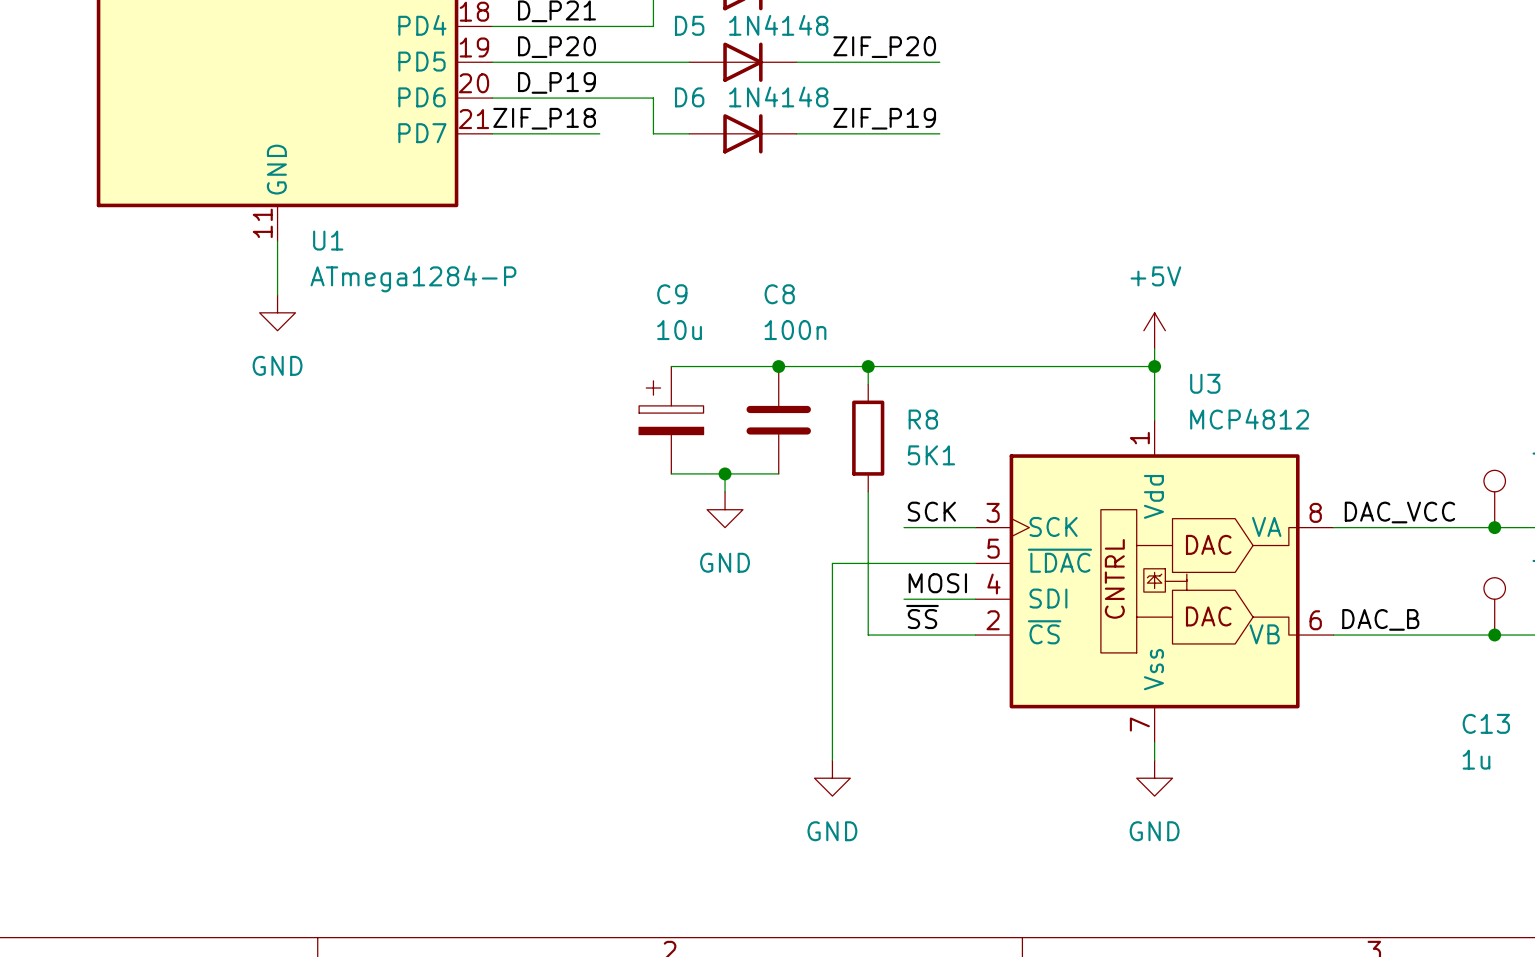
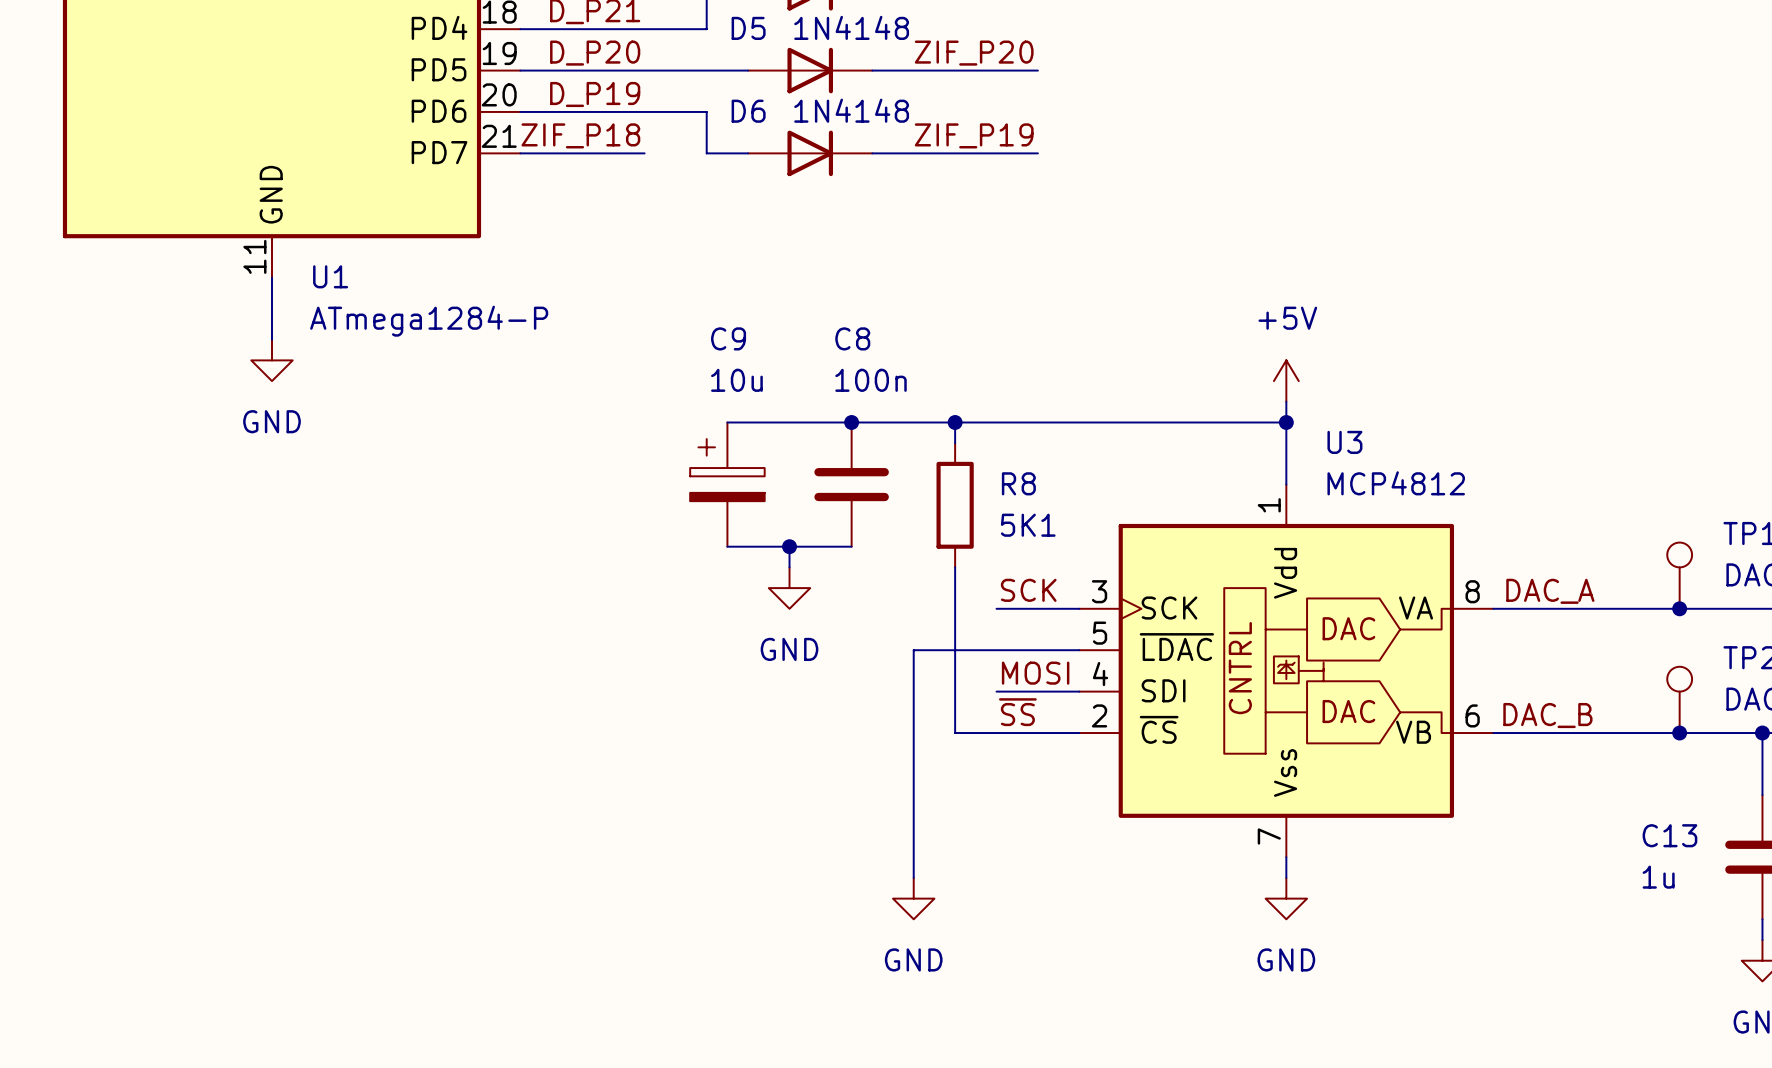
label: DAC_VCC (1399, 512) -> DAC_A (1550, 591)

